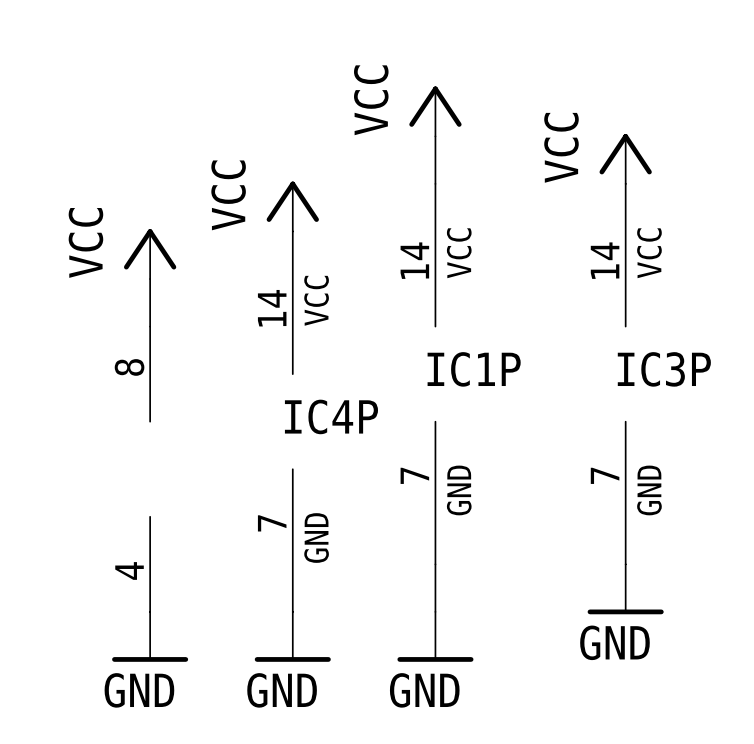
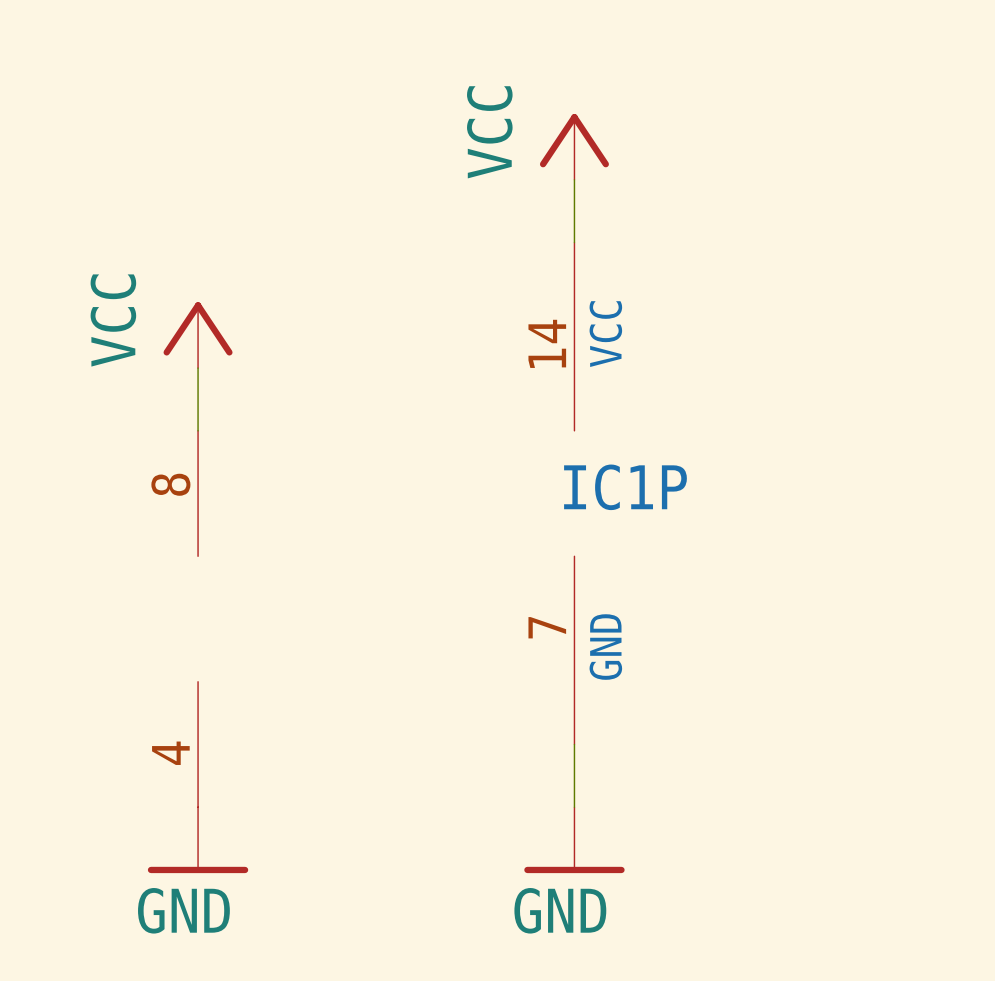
power symbol: VCC (625, 158) -> none
power symbol: VCC (292, 206) -> none
IC3P: (625, 374) -> none
IC4P: (292, 421) -> none
power symbol: GND (625, 589) -> none
power symbol: GND (292, 636) -> none

